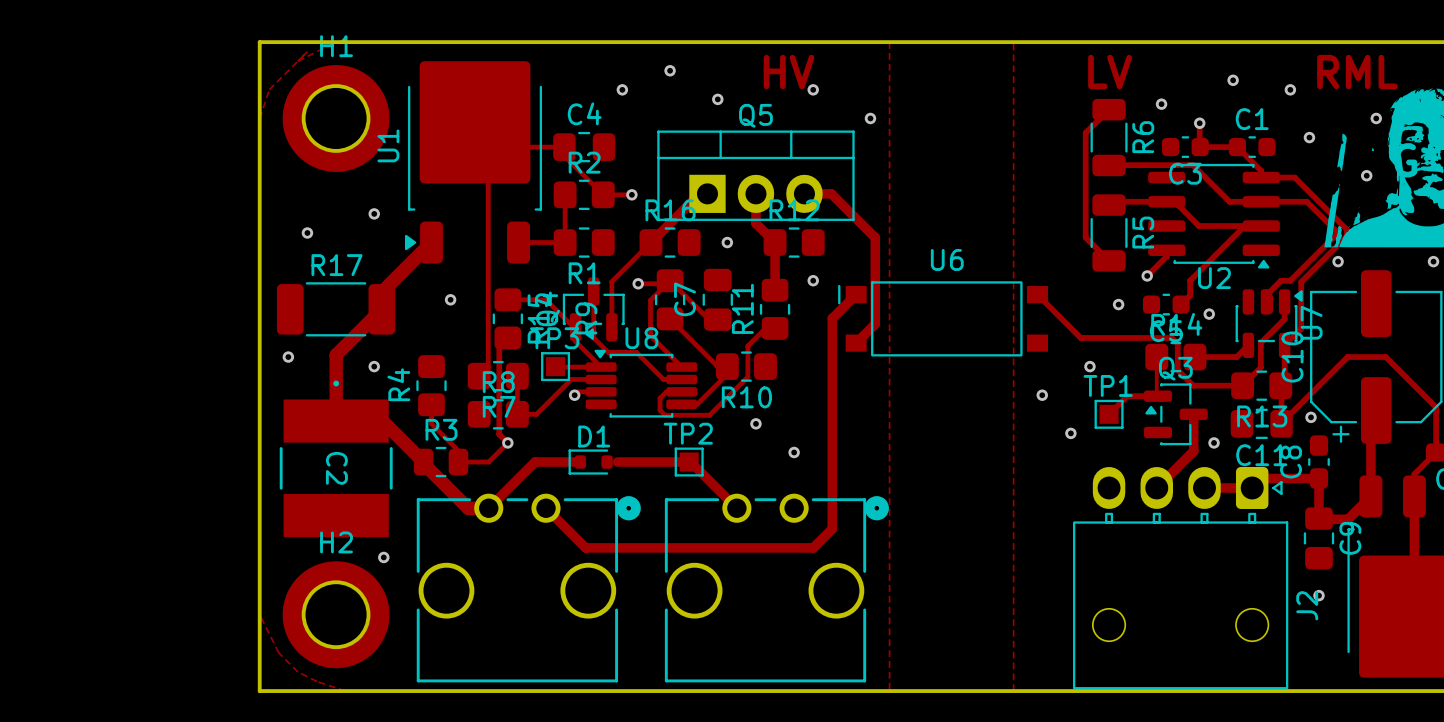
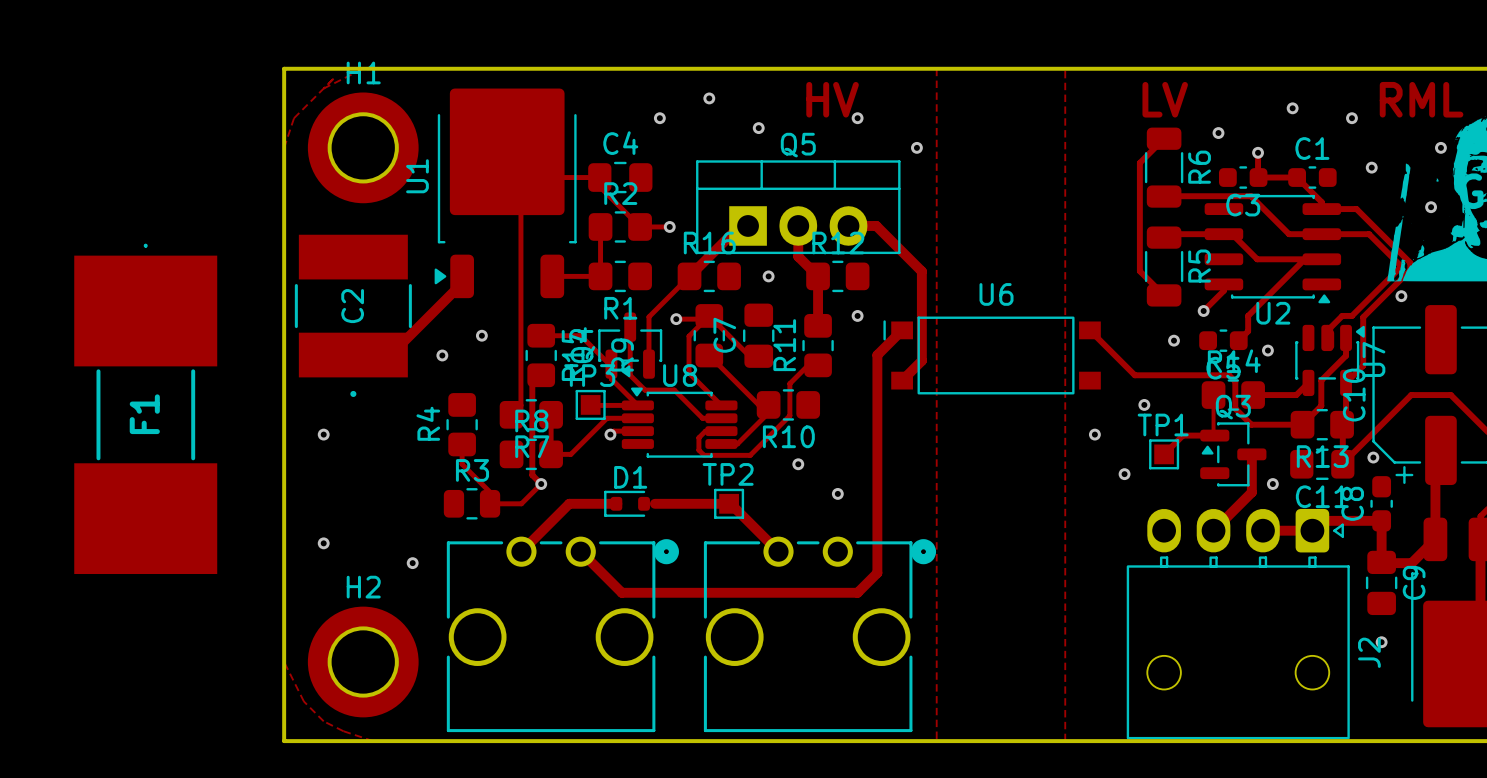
via: (374, 213) -> none
via: (307, 232) -> none
track: (431, 242) (381, 292) (381, 309) (336, 355) (336, 421) (382, 421) (468, 508) (488, 508) -> (462, 276) (462, 283) (390, 355) (353, 355)
R17: (336, 309) -> none
via: none -> (442, 355)
via position: (288, 357) -> (323, 434)
via: (374, 366) -> none
F1: none -> (145, 408)
C2 rotation: 0° (336, 458) -> 180° (353, 315)
C2 position: (336, 458) -> (353, 315)
via: none -> (323, 543)
via position: (383, 557) -> (412, 563)

